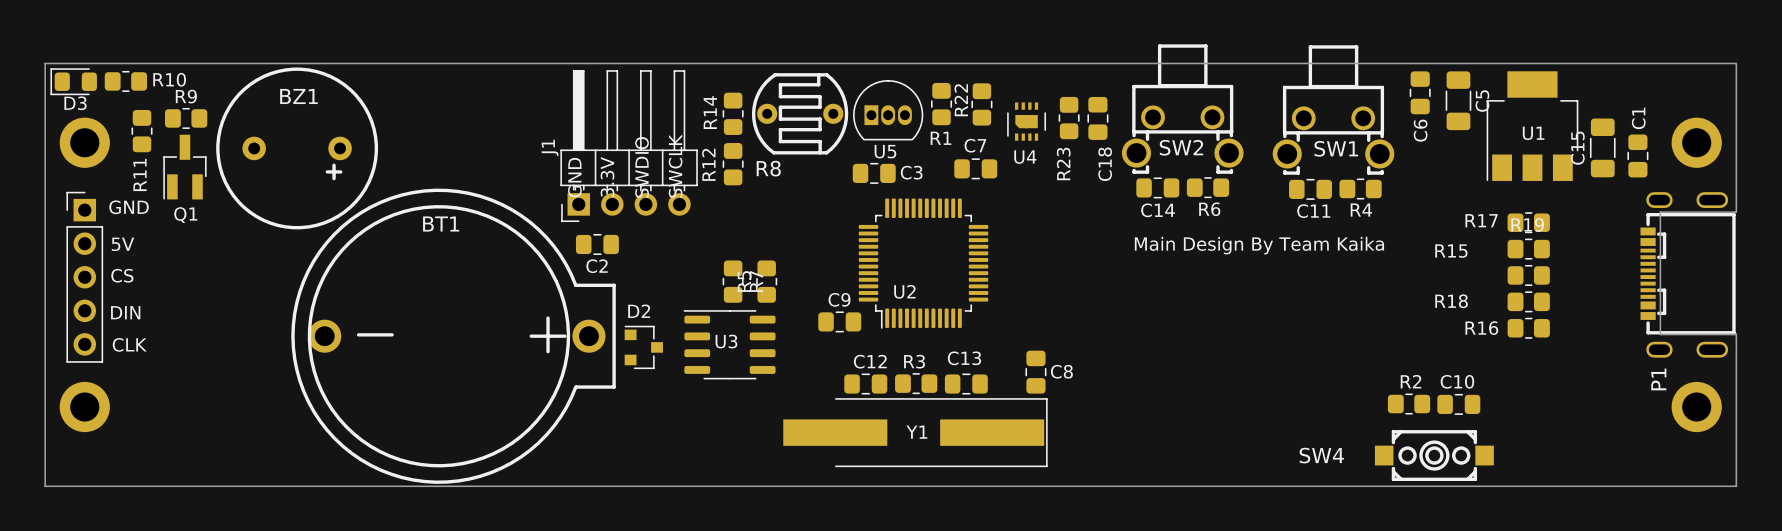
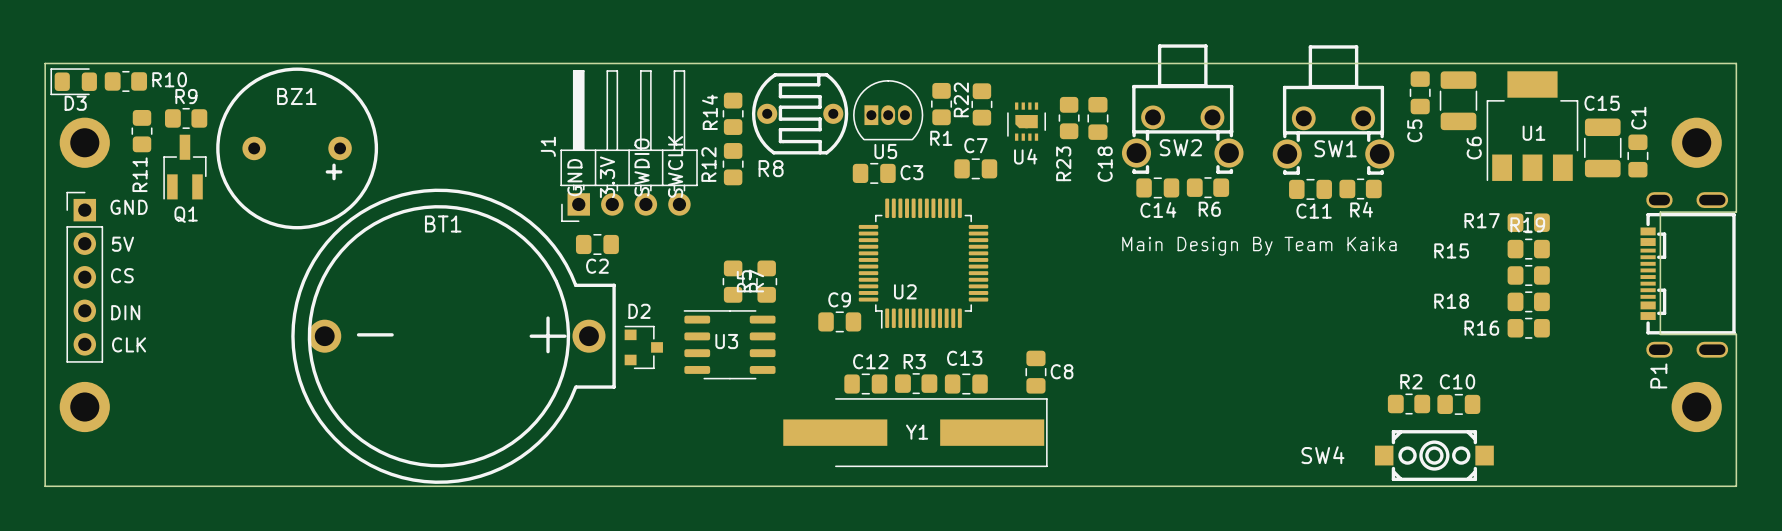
C5 footprint: [1445, 71, 1472, 131] -> [1439, 71, 1478, 131]
C5 name position: C5 (1482, 101) -> C5 (1414, 130)
C15 footprint: [1589, 118, 1616, 178] -> [1584, 118, 1622, 178]
C6 name position: C6 (1420, 130) -> C6 (1474, 148)
C15 name rotation: 0° (1577, 148) -> 90° clockwise (1602, 103)
C15 name position: C15 (1577, 148) -> C15 (1602, 103)

